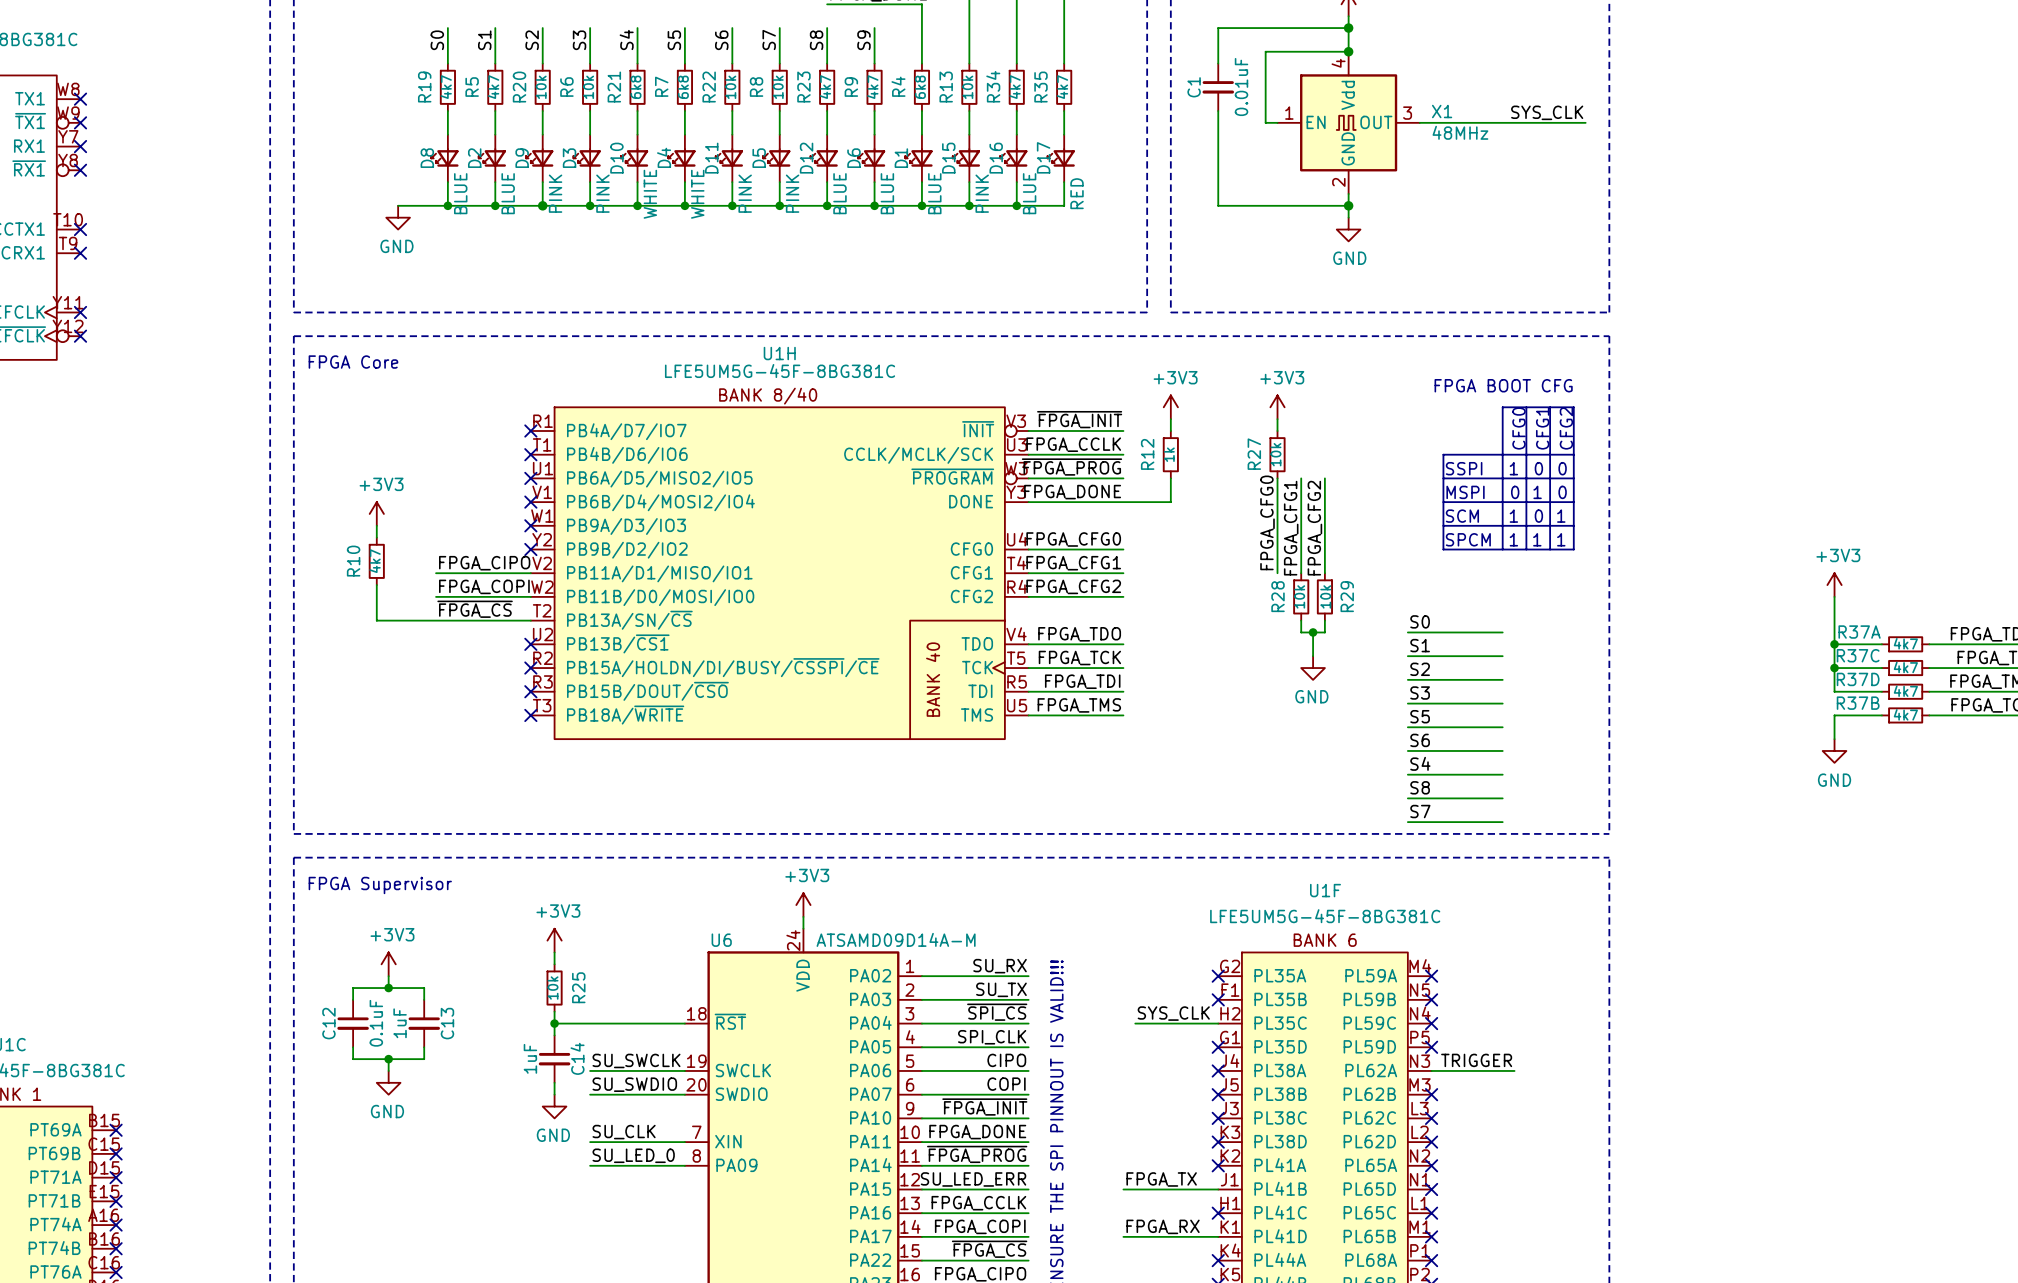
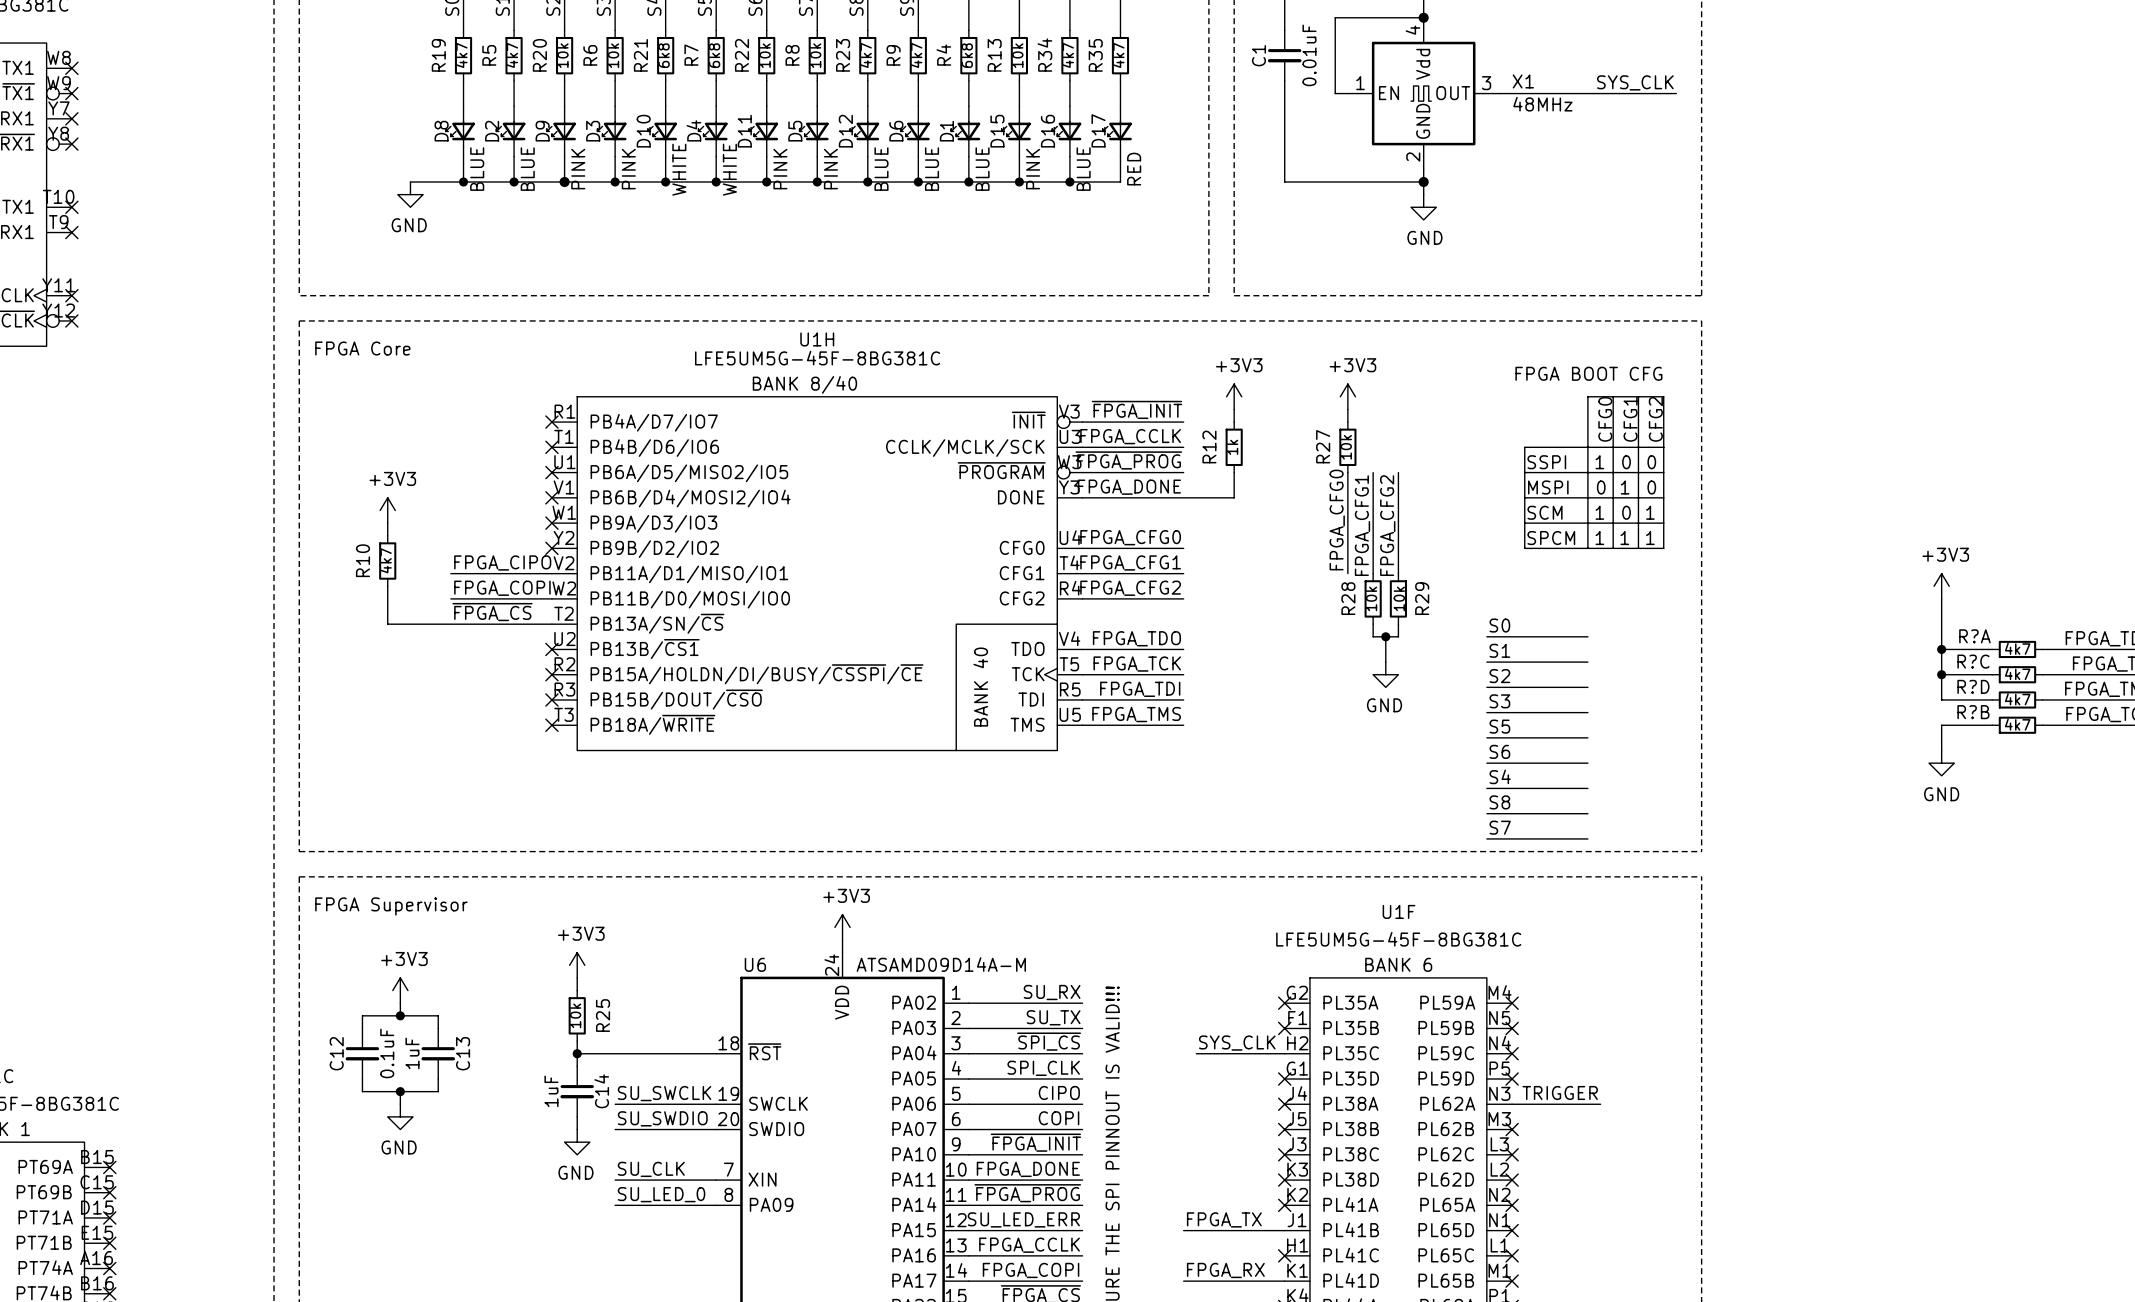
R37A name: R37A (1859, 632) -> R?A (1974, 636)
R37C name: R37C (1858, 655) -> R?C (1973, 661)
R37D name: R37D (1858, 679) -> R?D (1973, 686)
R37B name: R37B (1858, 703) -> R?B (1973, 712)

